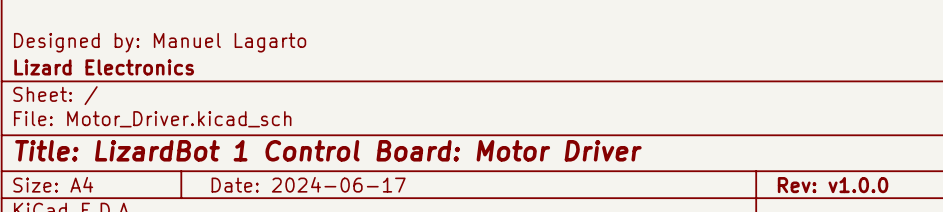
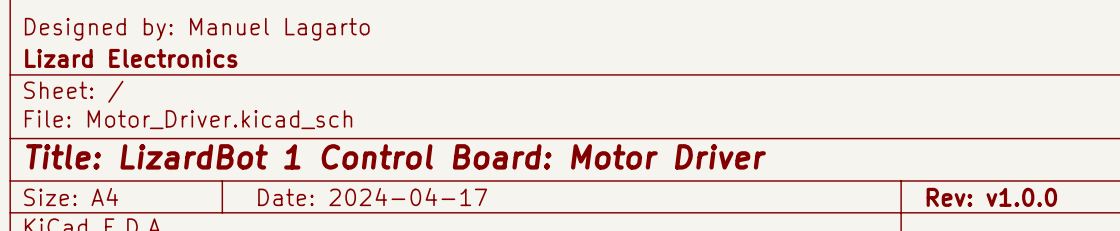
title block: Date: 2024-06-17 (308, 184) -> Date: 2024-04-17 (372, 196)

